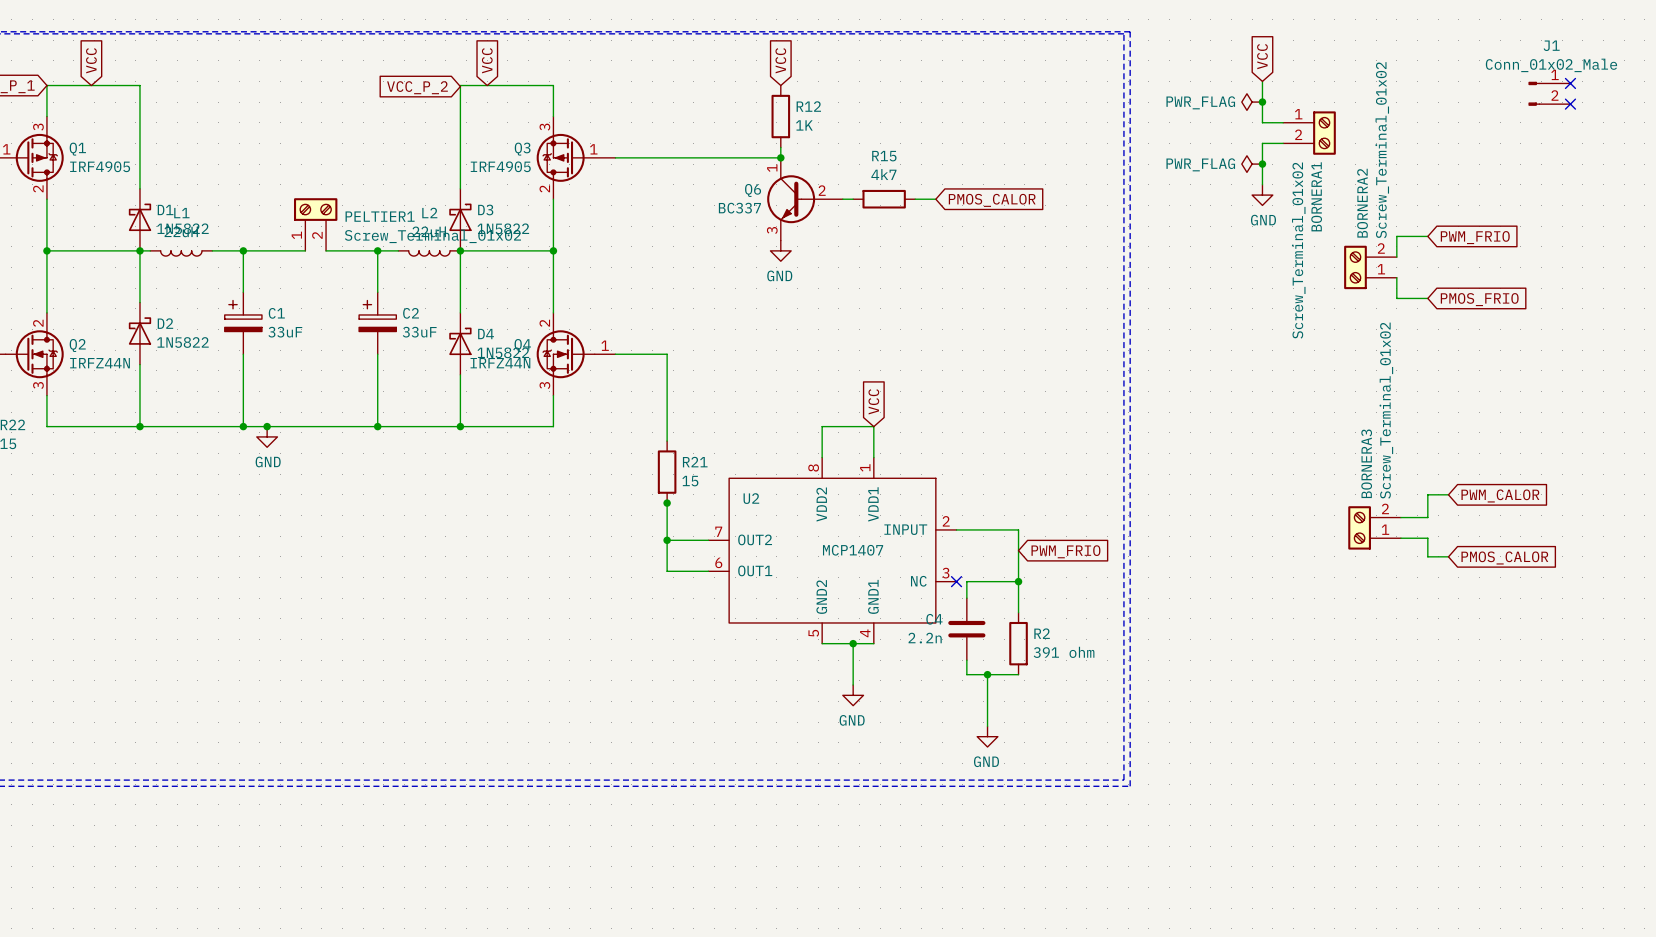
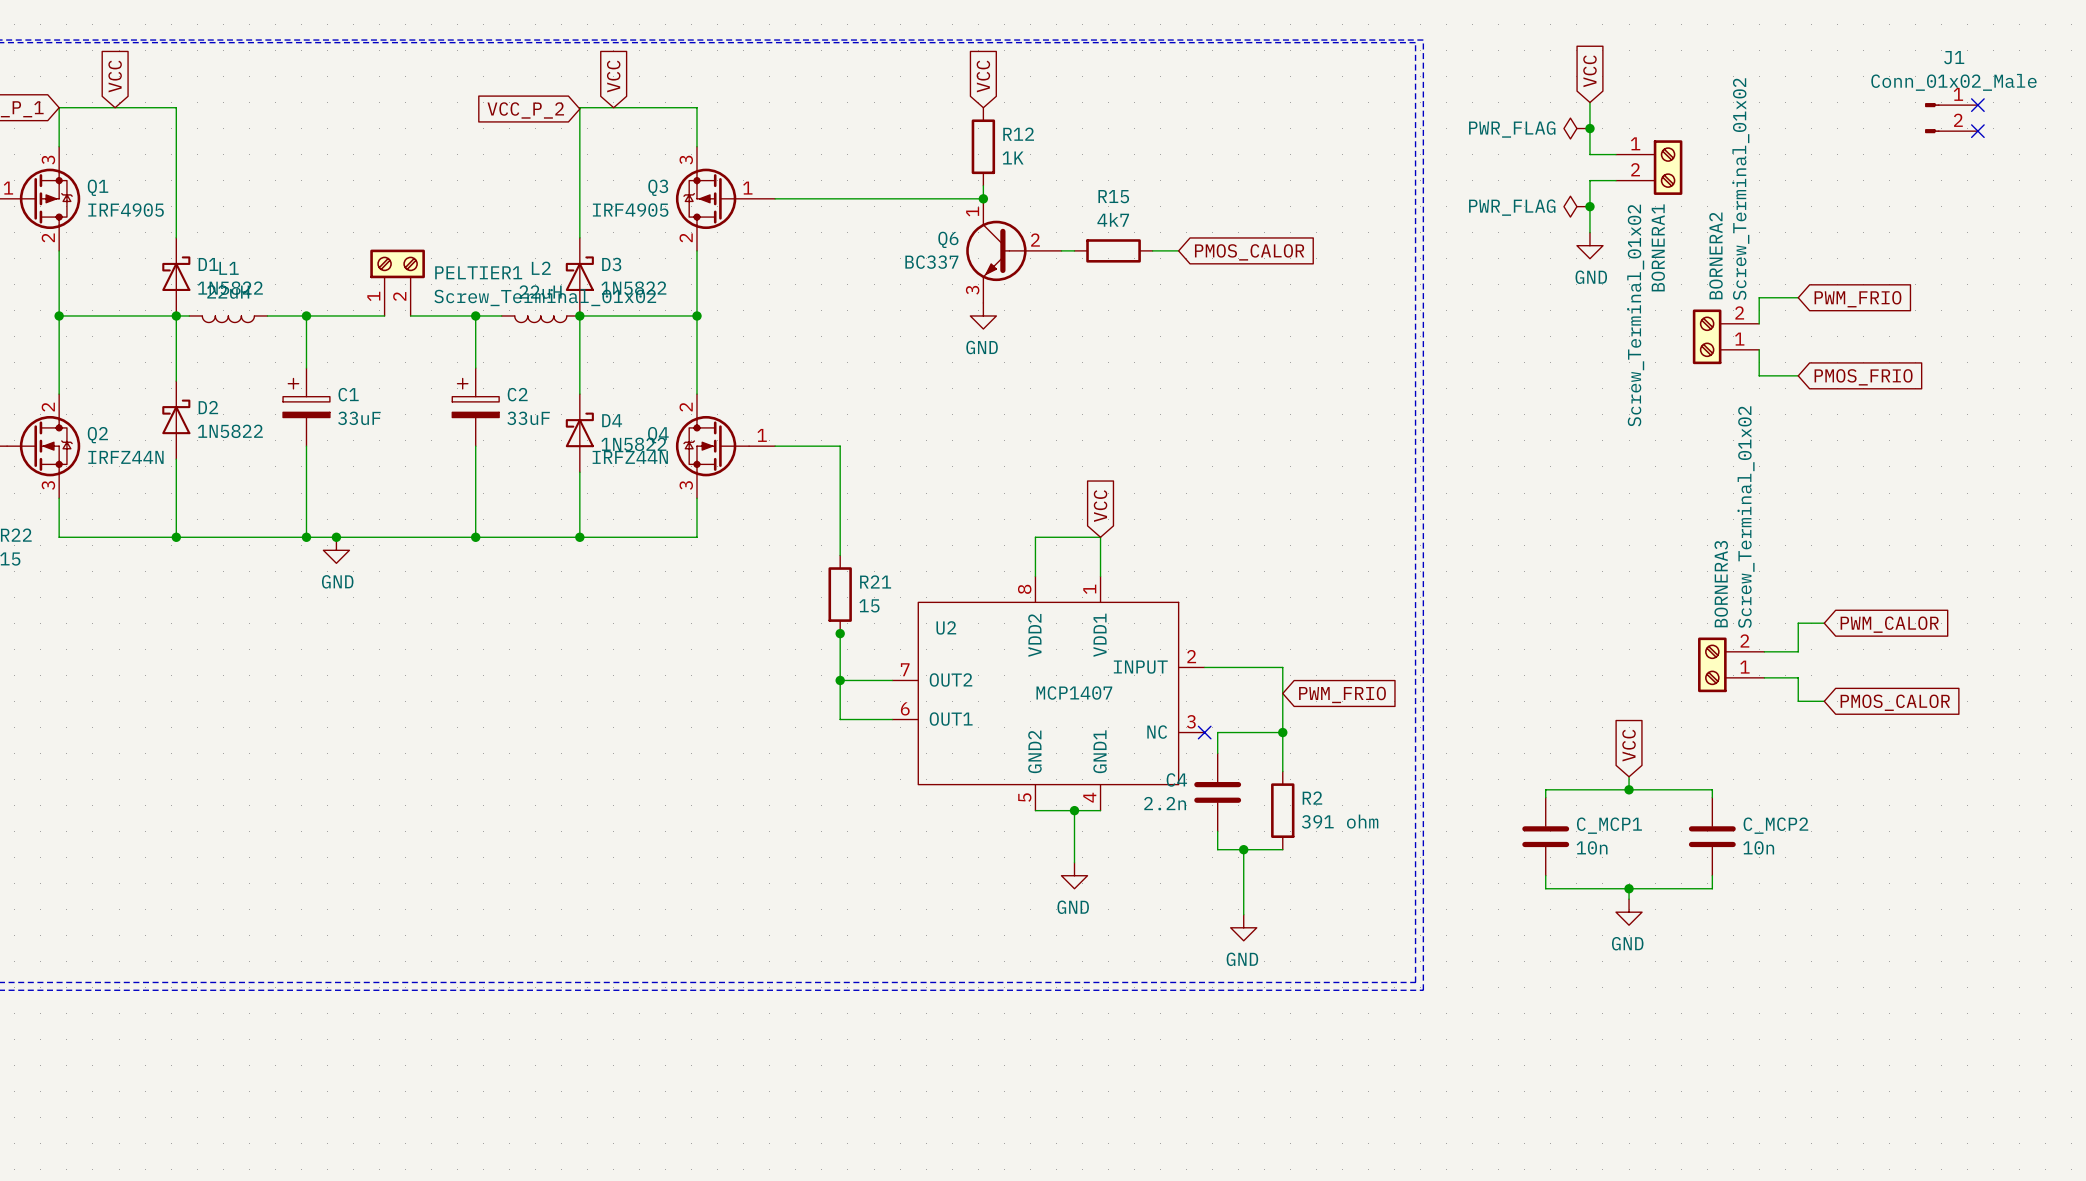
global label: none -> VCC (1629, 745)
wire: none -> (1629, 776) (1629, 789)
junction: none -> (1629, 789)
wire: none -> (1545, 797) (1545, 789) (1712, 789) (1712, 797)
C_MCP1: none -> 10n (1545, 836)
C_MCP2: none -> 10n (1712, 836)
wire: none -> (1545, 875) (1545, 888) (1712, 888) (1712, 875)
wire: none -> (1629, 888) (1629, 899)
junction: none -> (1629, 888)
power symbol: none -> GND (1629, 912)

